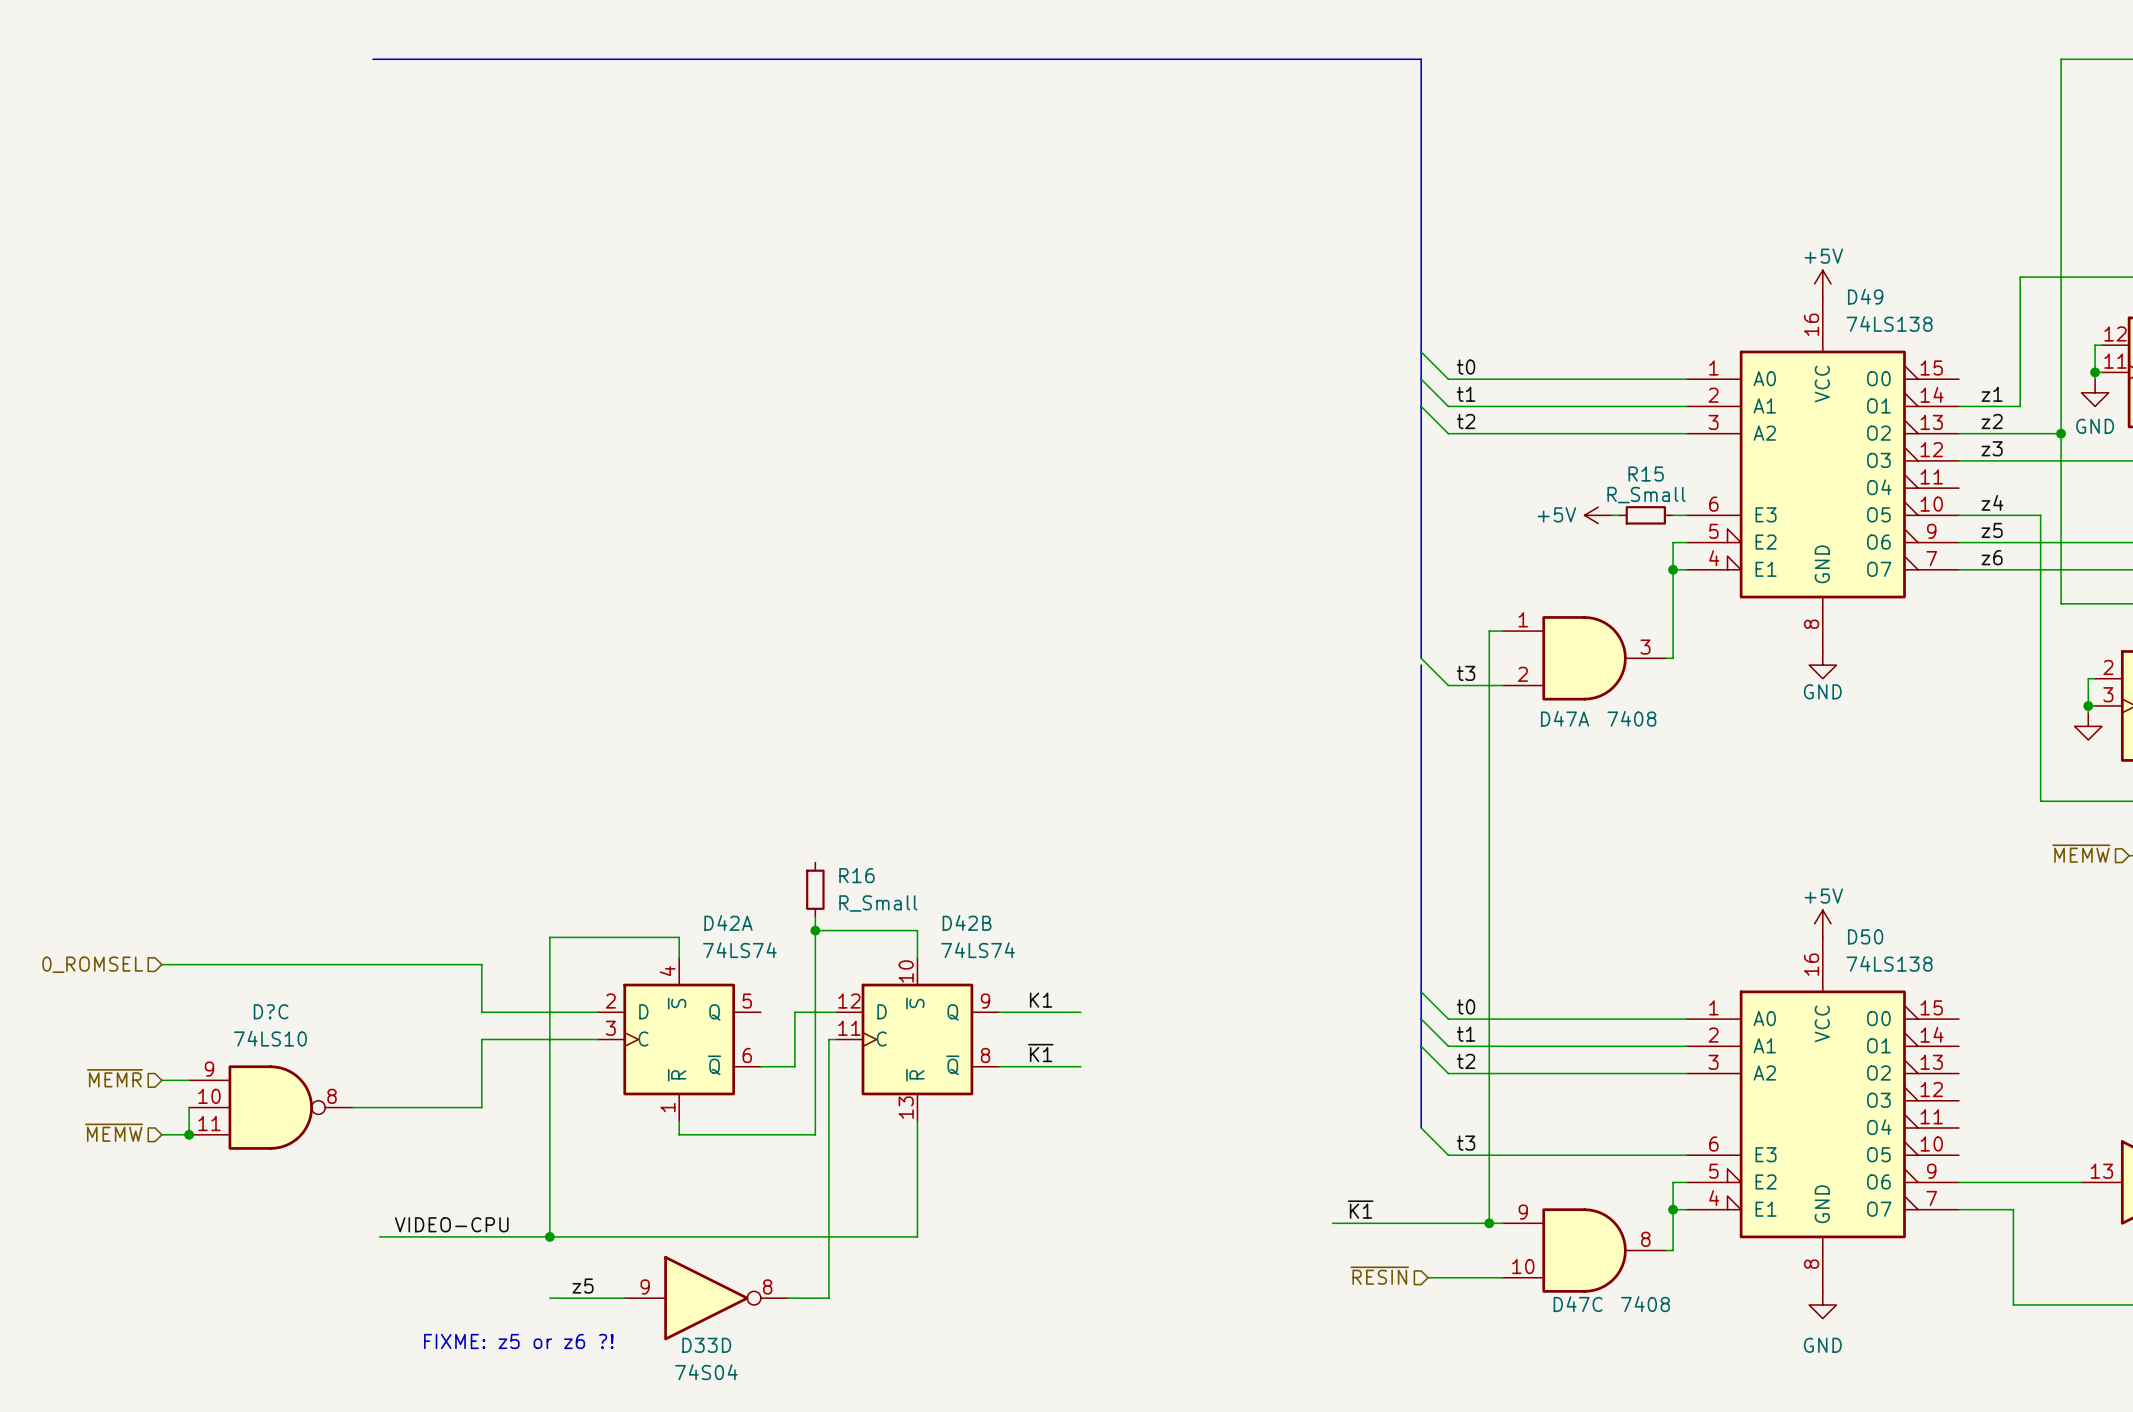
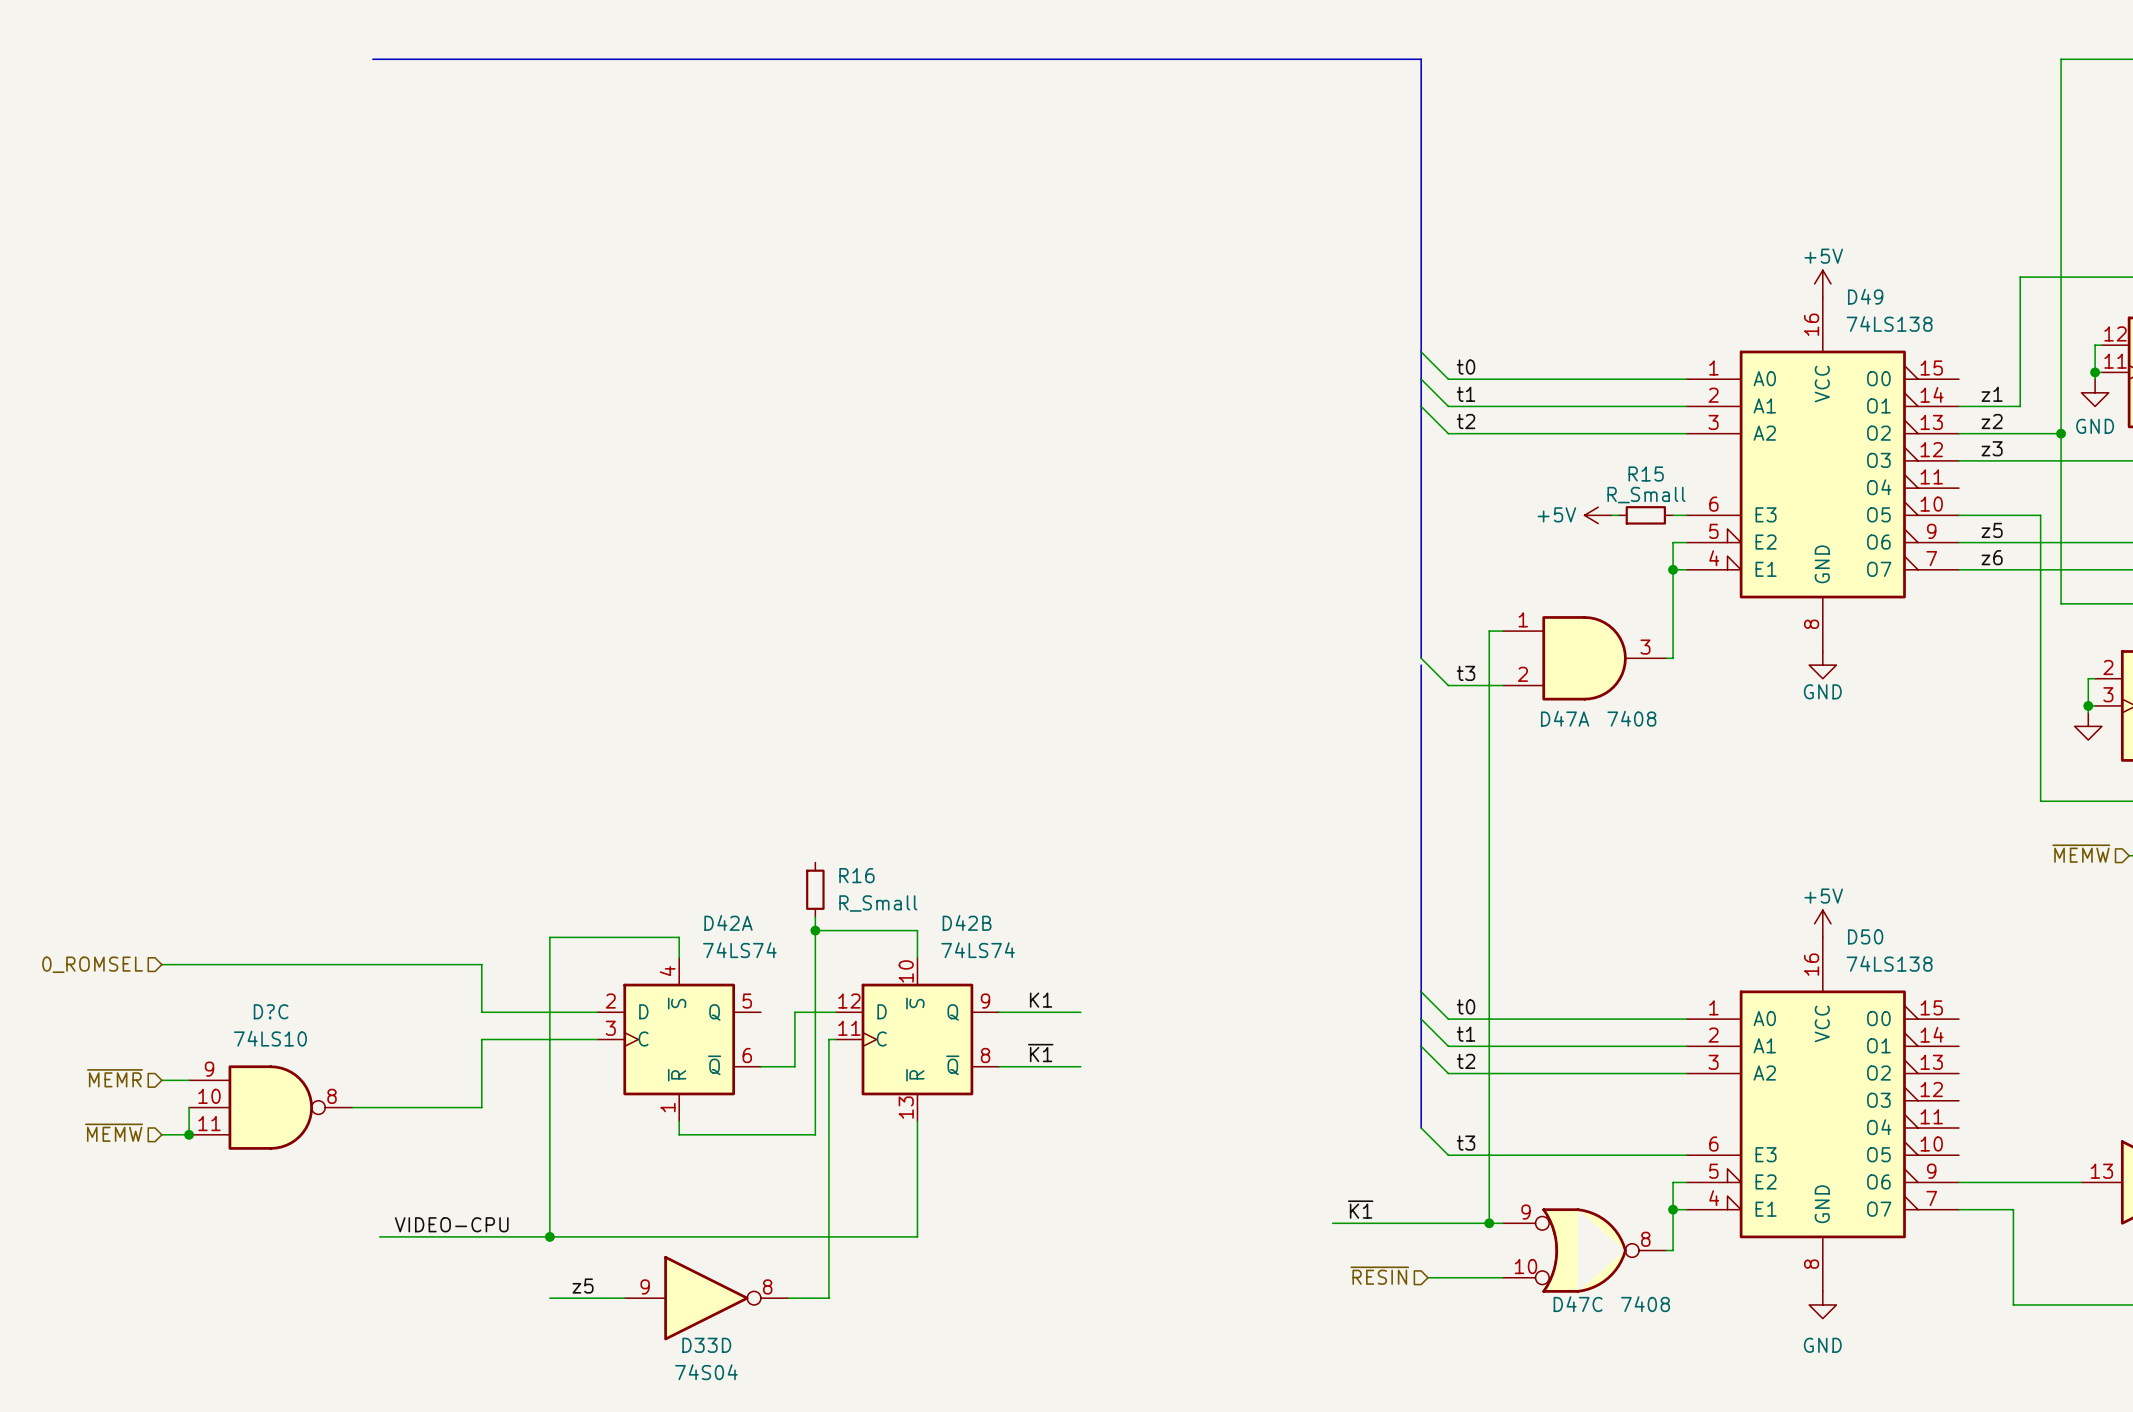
label: z4 (1992, 502) -> none
D47C symbol: [1502, 1208, 1667, 1293] -> [1502, 1208, 1667, 1293]
text: FIXME: z5 or z6 ?! (518, 1341) -> none

